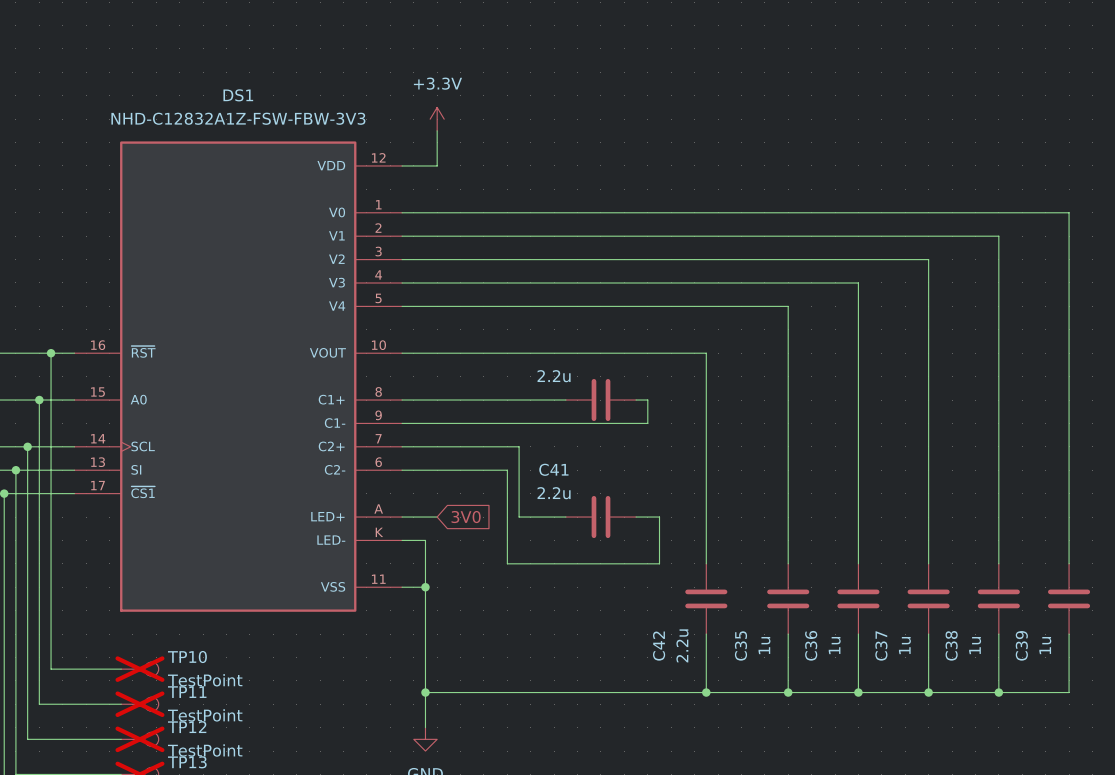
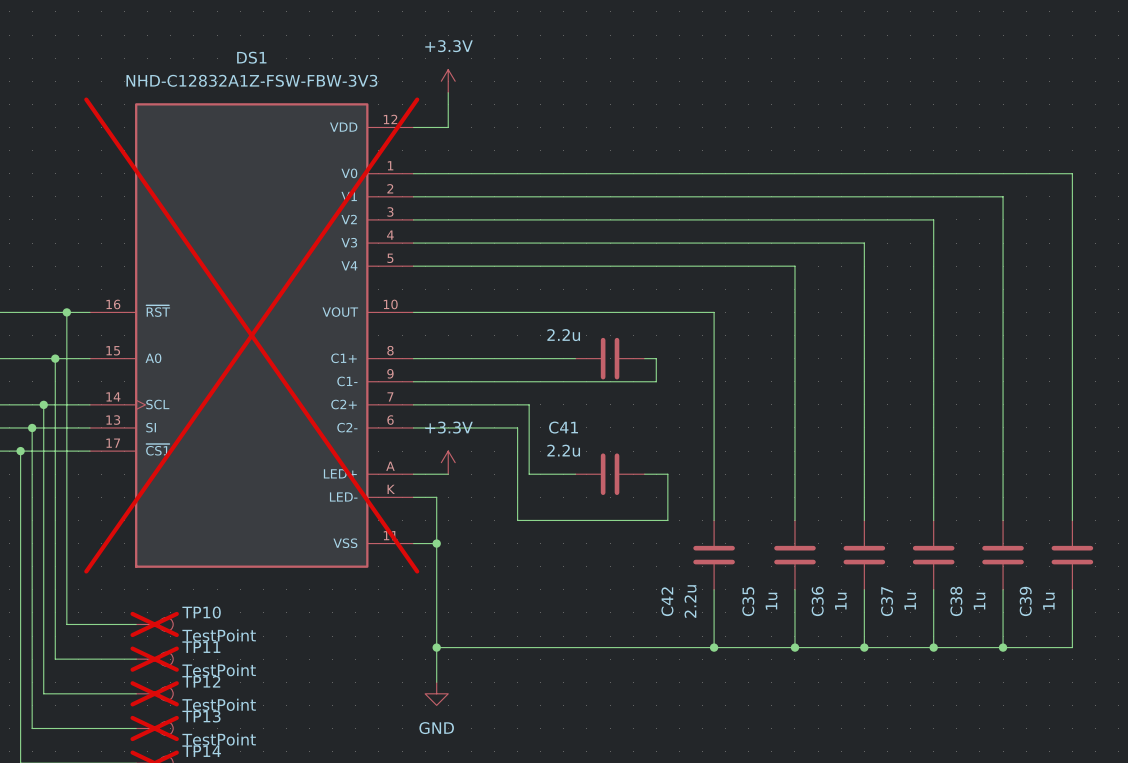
DS1 do-not-place cross: none -> (251, 335)
power symbol: none -> +3.3V (448, 462)
global label: 3V0 (466, 517) -> none

